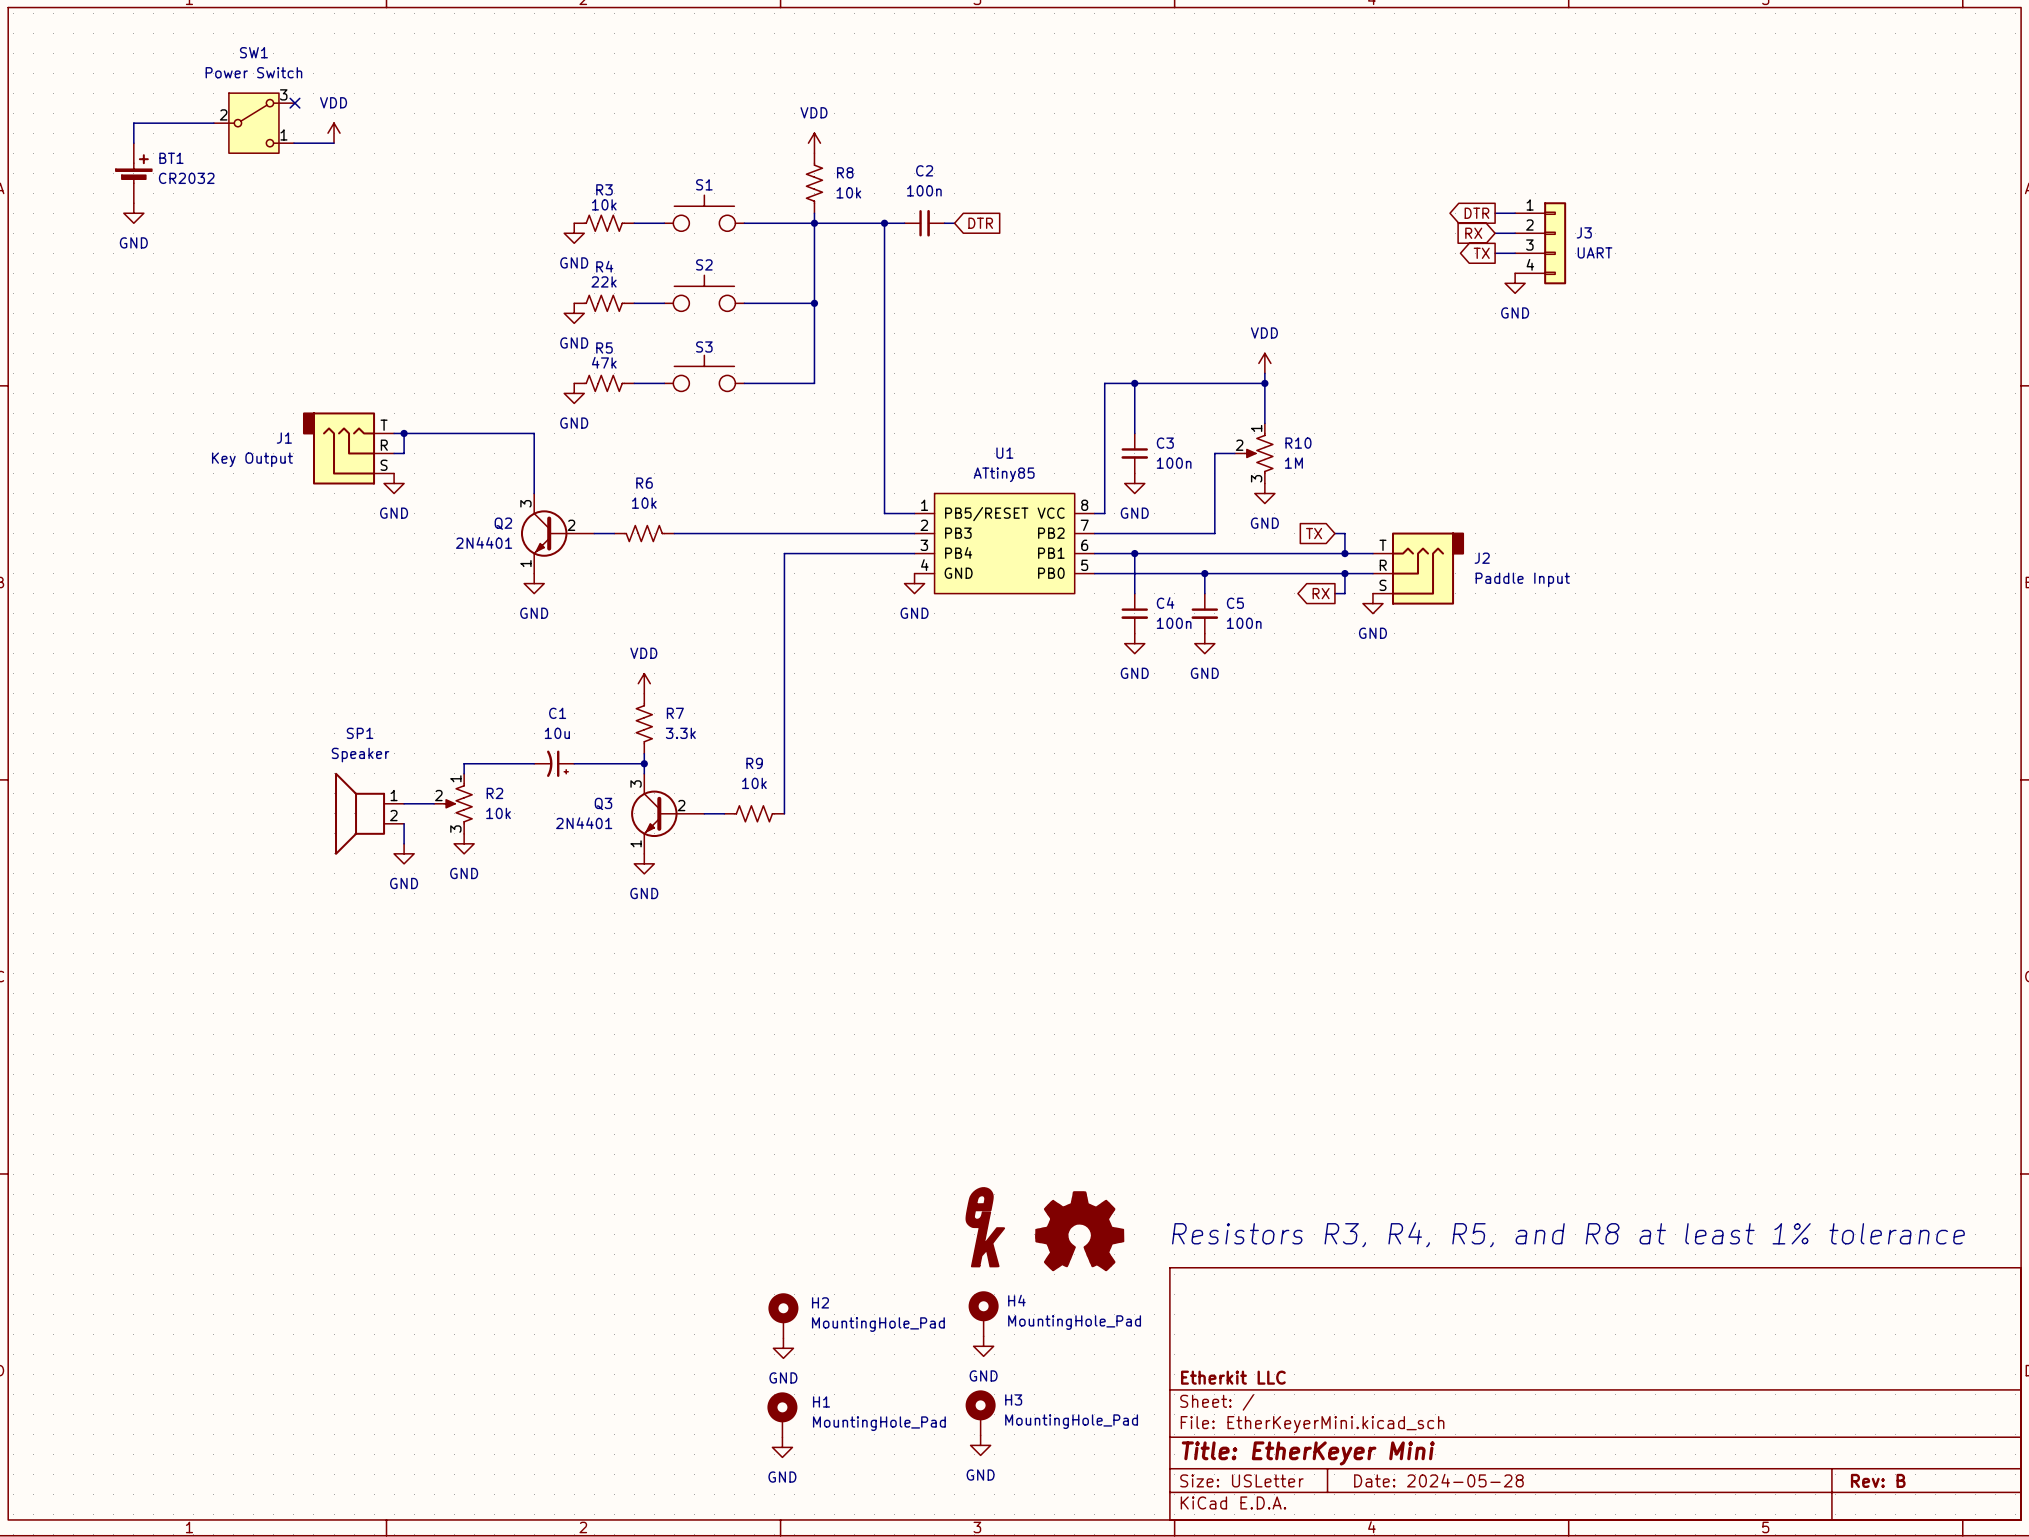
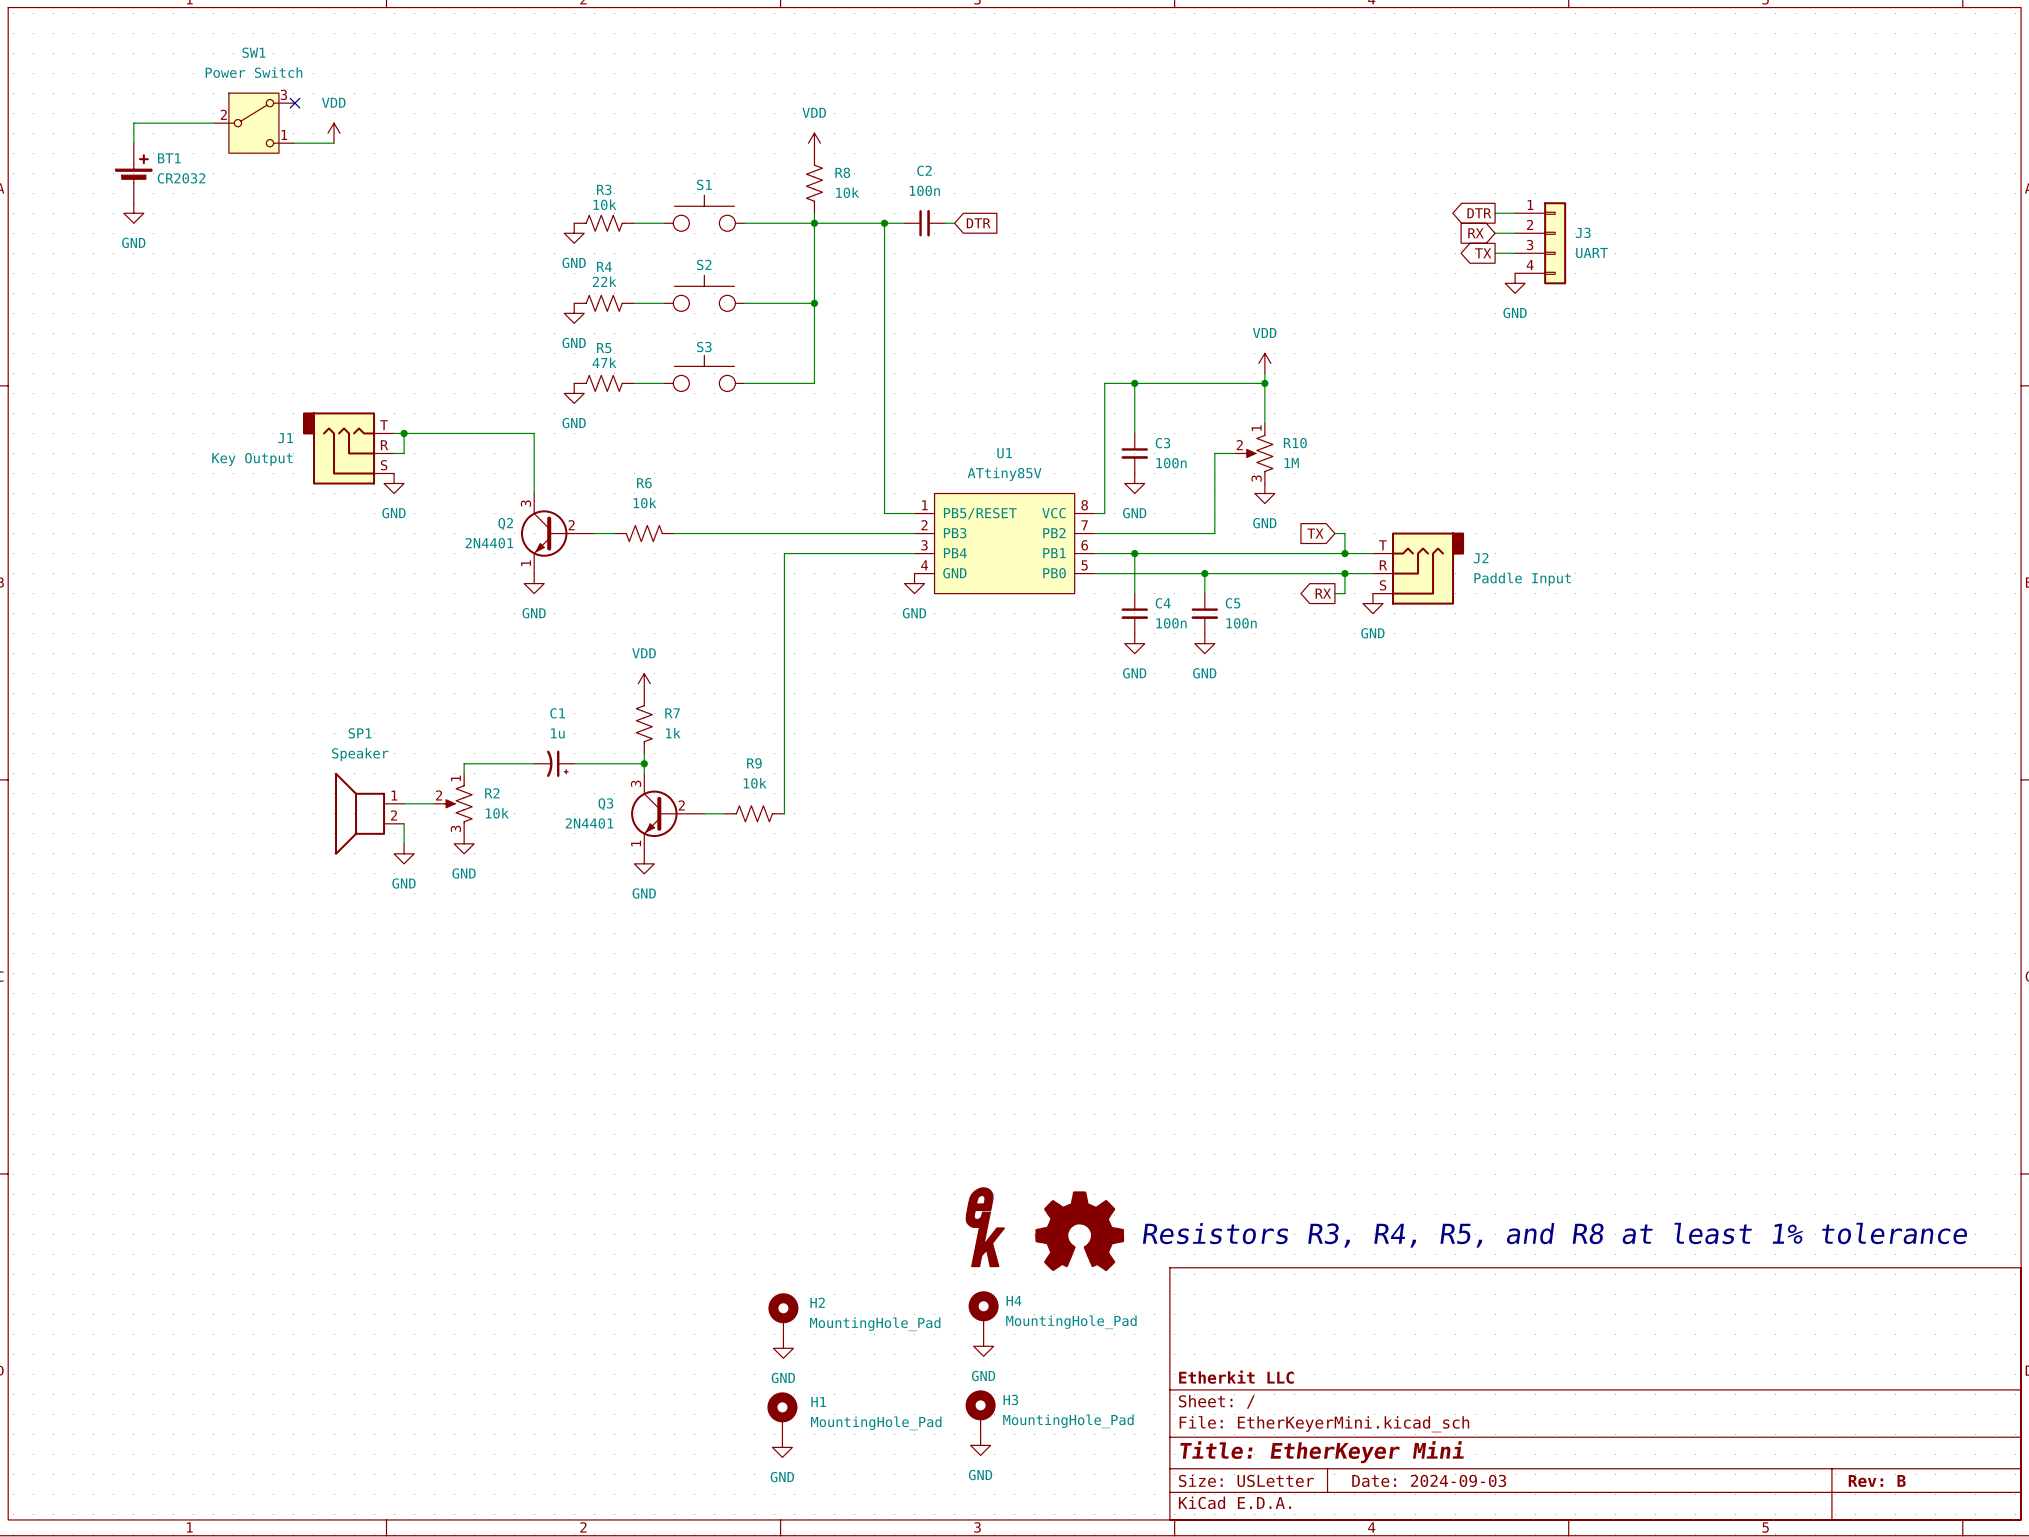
U1 value: ATtiny85 (1004, 474) -> ATtiny85V (1004, 474)
C1 value: 10u (557, 733) -> 1u (557, 733)
R7 value: 3.3k (680, 733) -> 1k (673, 733)
title block: Date: 2024-05-28 (1438, 1480) -> Date: 2024-09-03 (1429, 1480)

